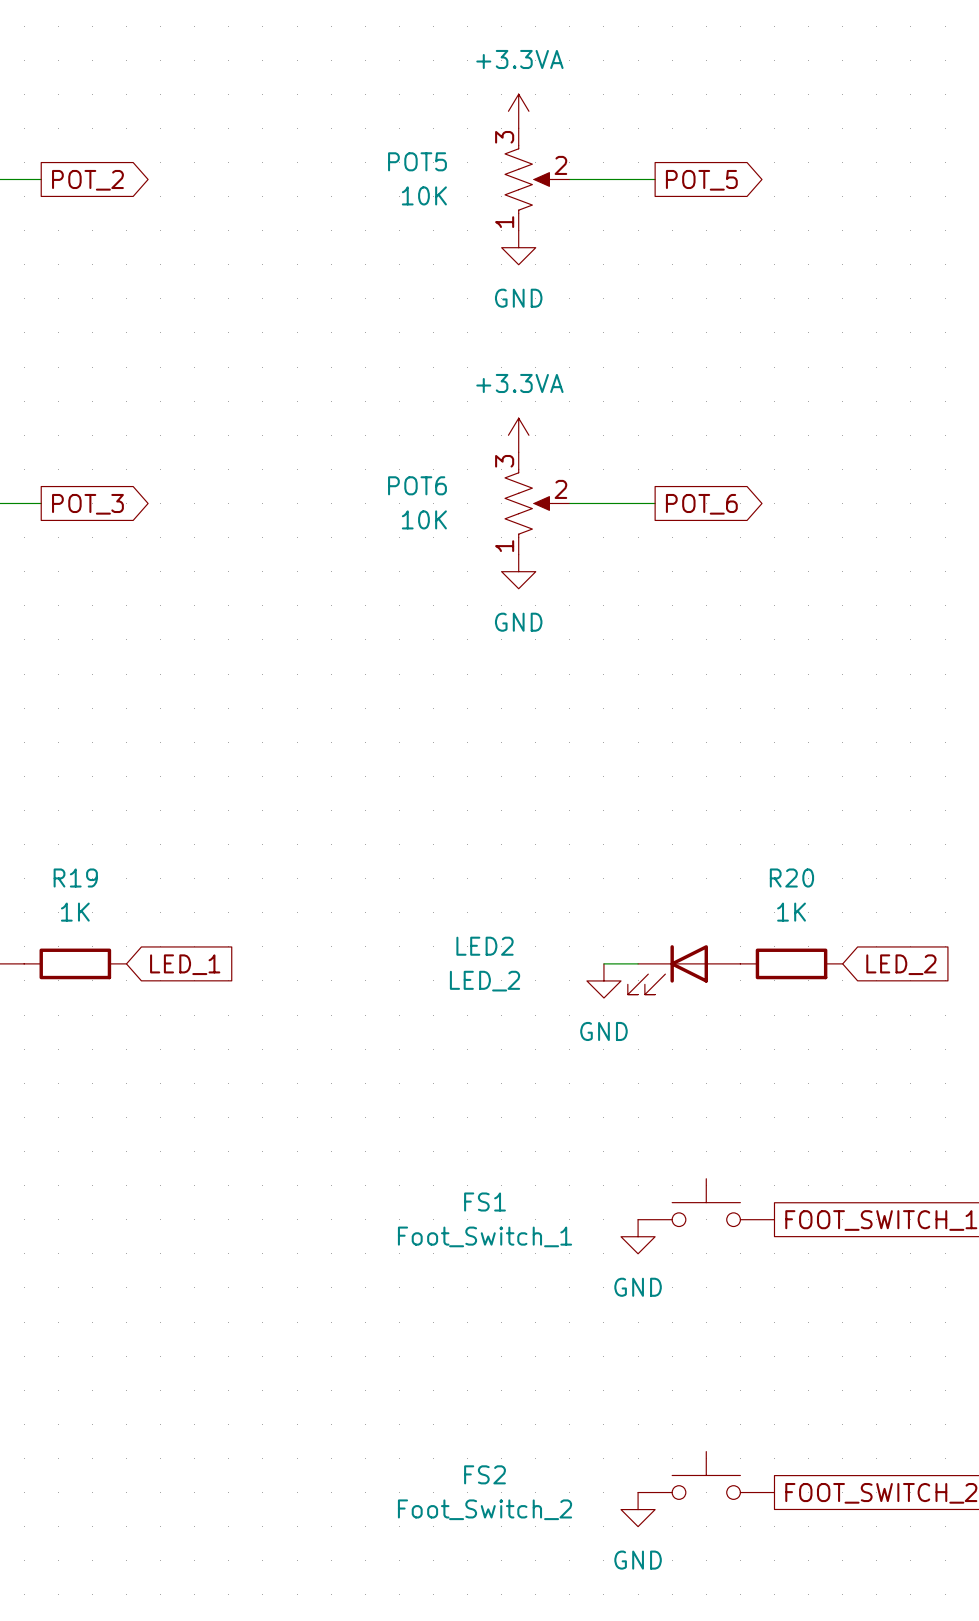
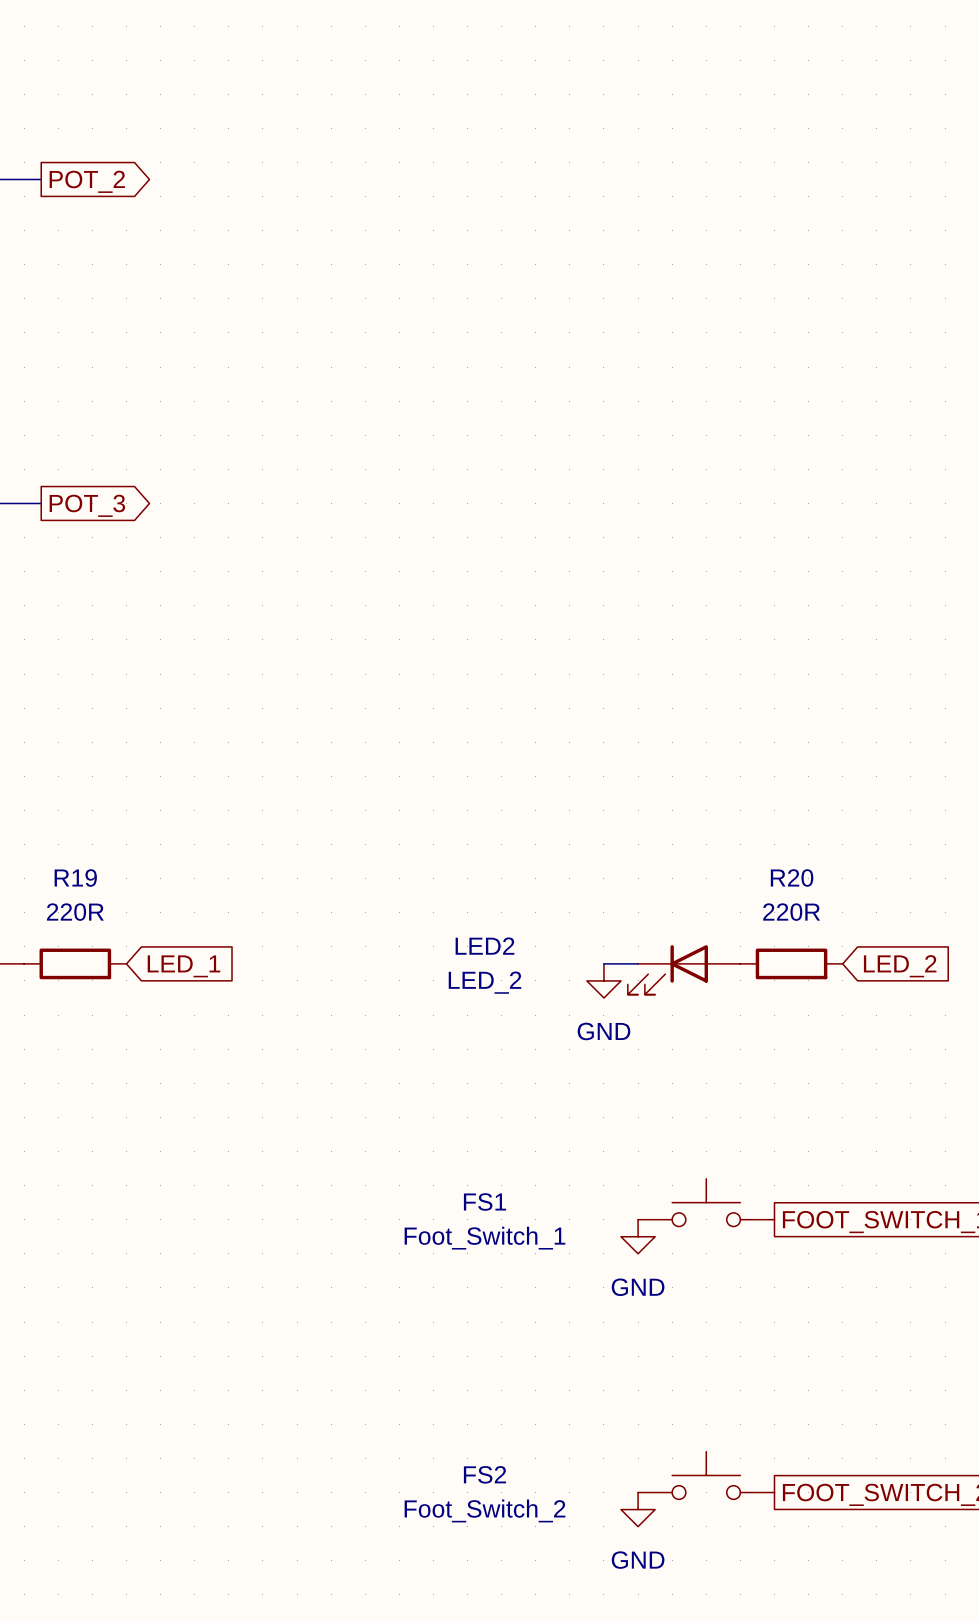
power symbol: +3.3VA (518, 111) -> none
POT5: 10K (537, 179) -> none
wire: (569, 179) (655, 179) -> none
global label: POT_5 (701, 180) -> none
power symbol: GND (518, 247) -> none
power symbol: +3.3VA (518, 435) -> none
POT6: 10K (537, 503) -> none
wire: (569, 503) (655, 503) -> none
global label: POT_6 (701, 504) -> none
power symbol: GND (518, 571) -> none
R19 value: 1K (75, 912) -> 220R (75, 912)
R20 value: 1K (791, 912) -> 220R (791, 912)

